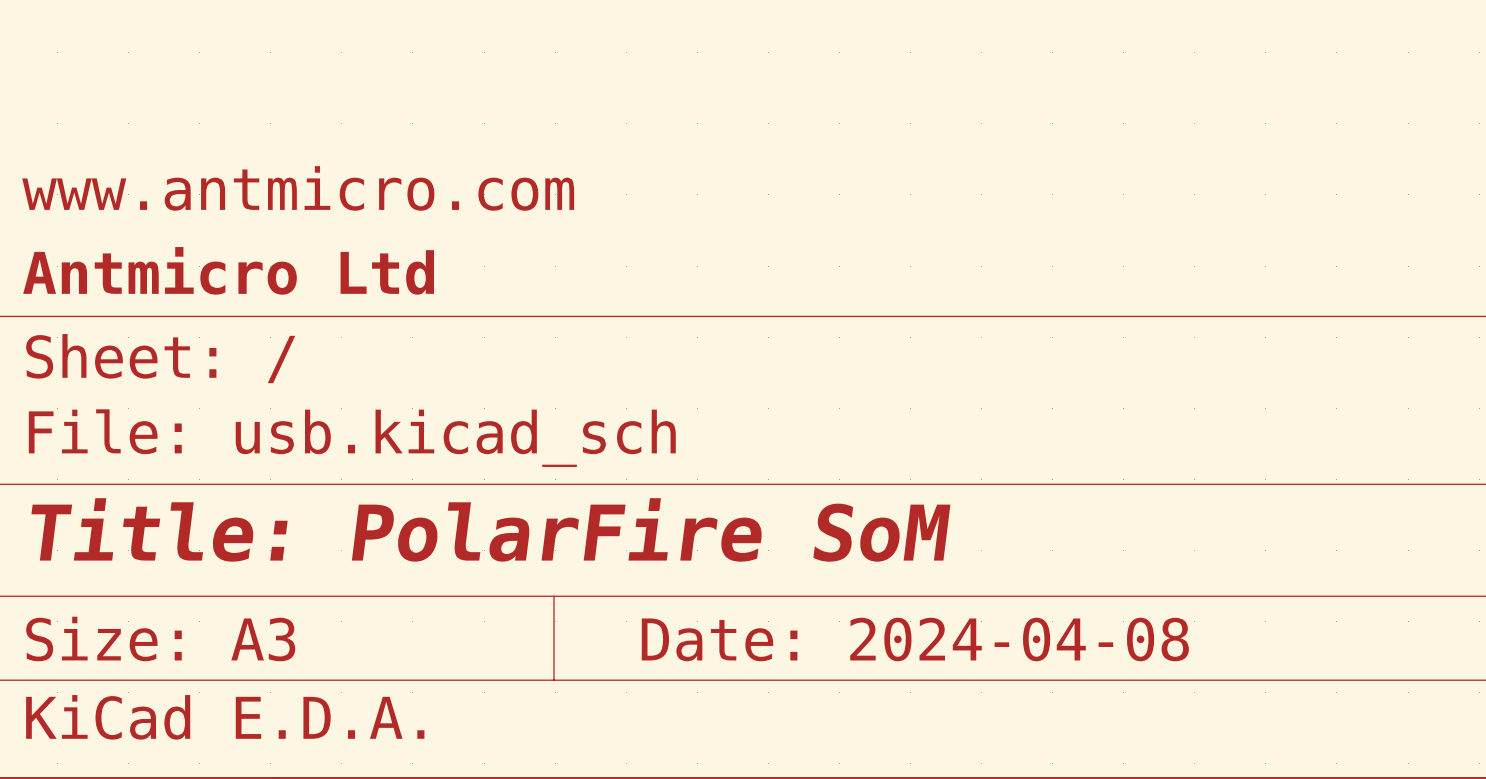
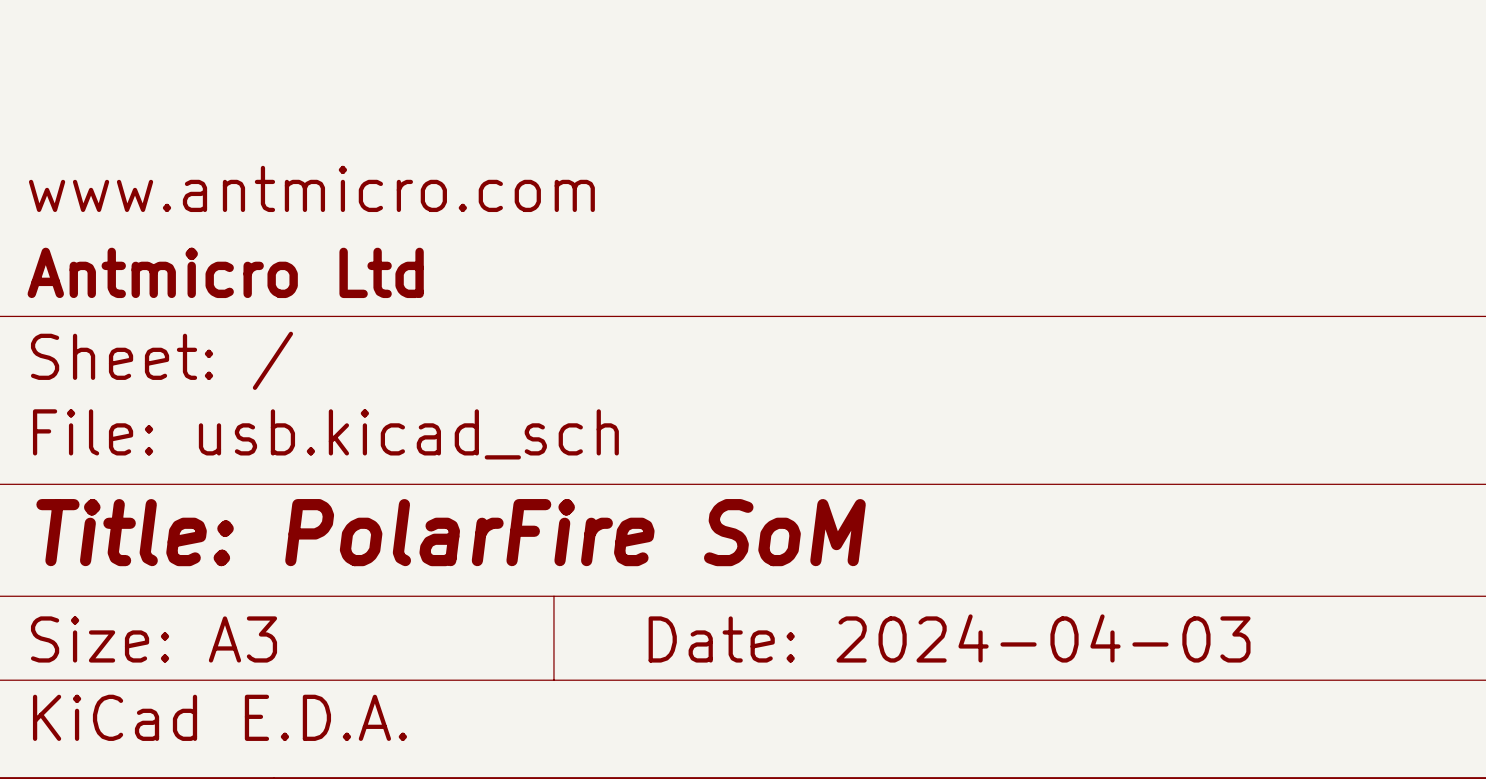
title block: Date: 2024-04-08 (915, 639) -> Date: 2024-04-03 (949, 638)

